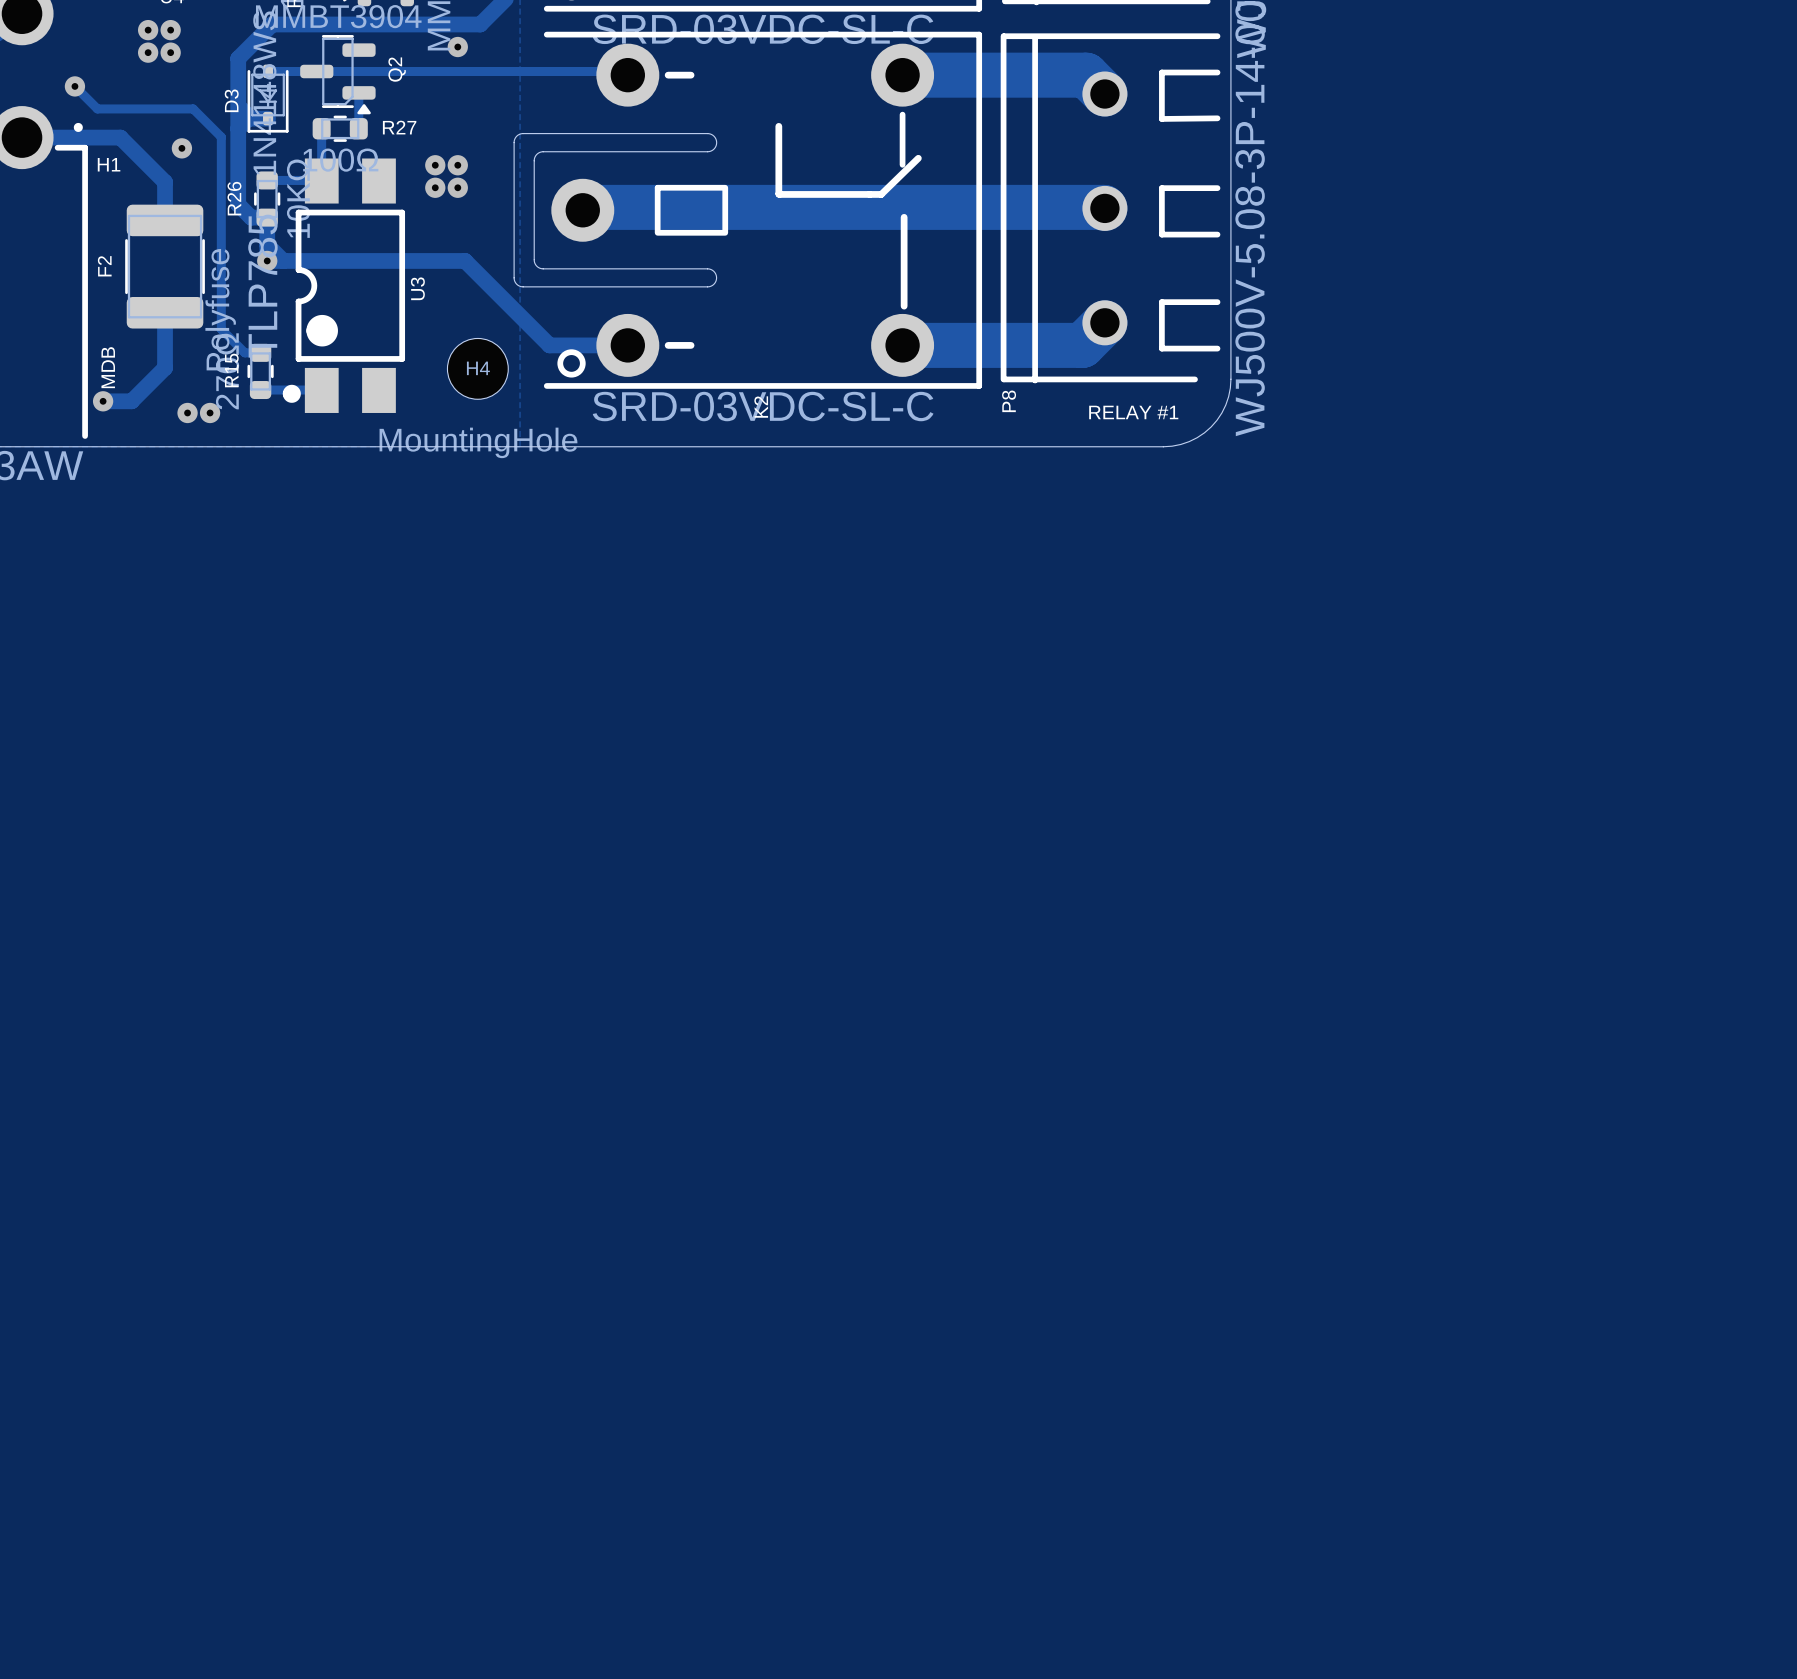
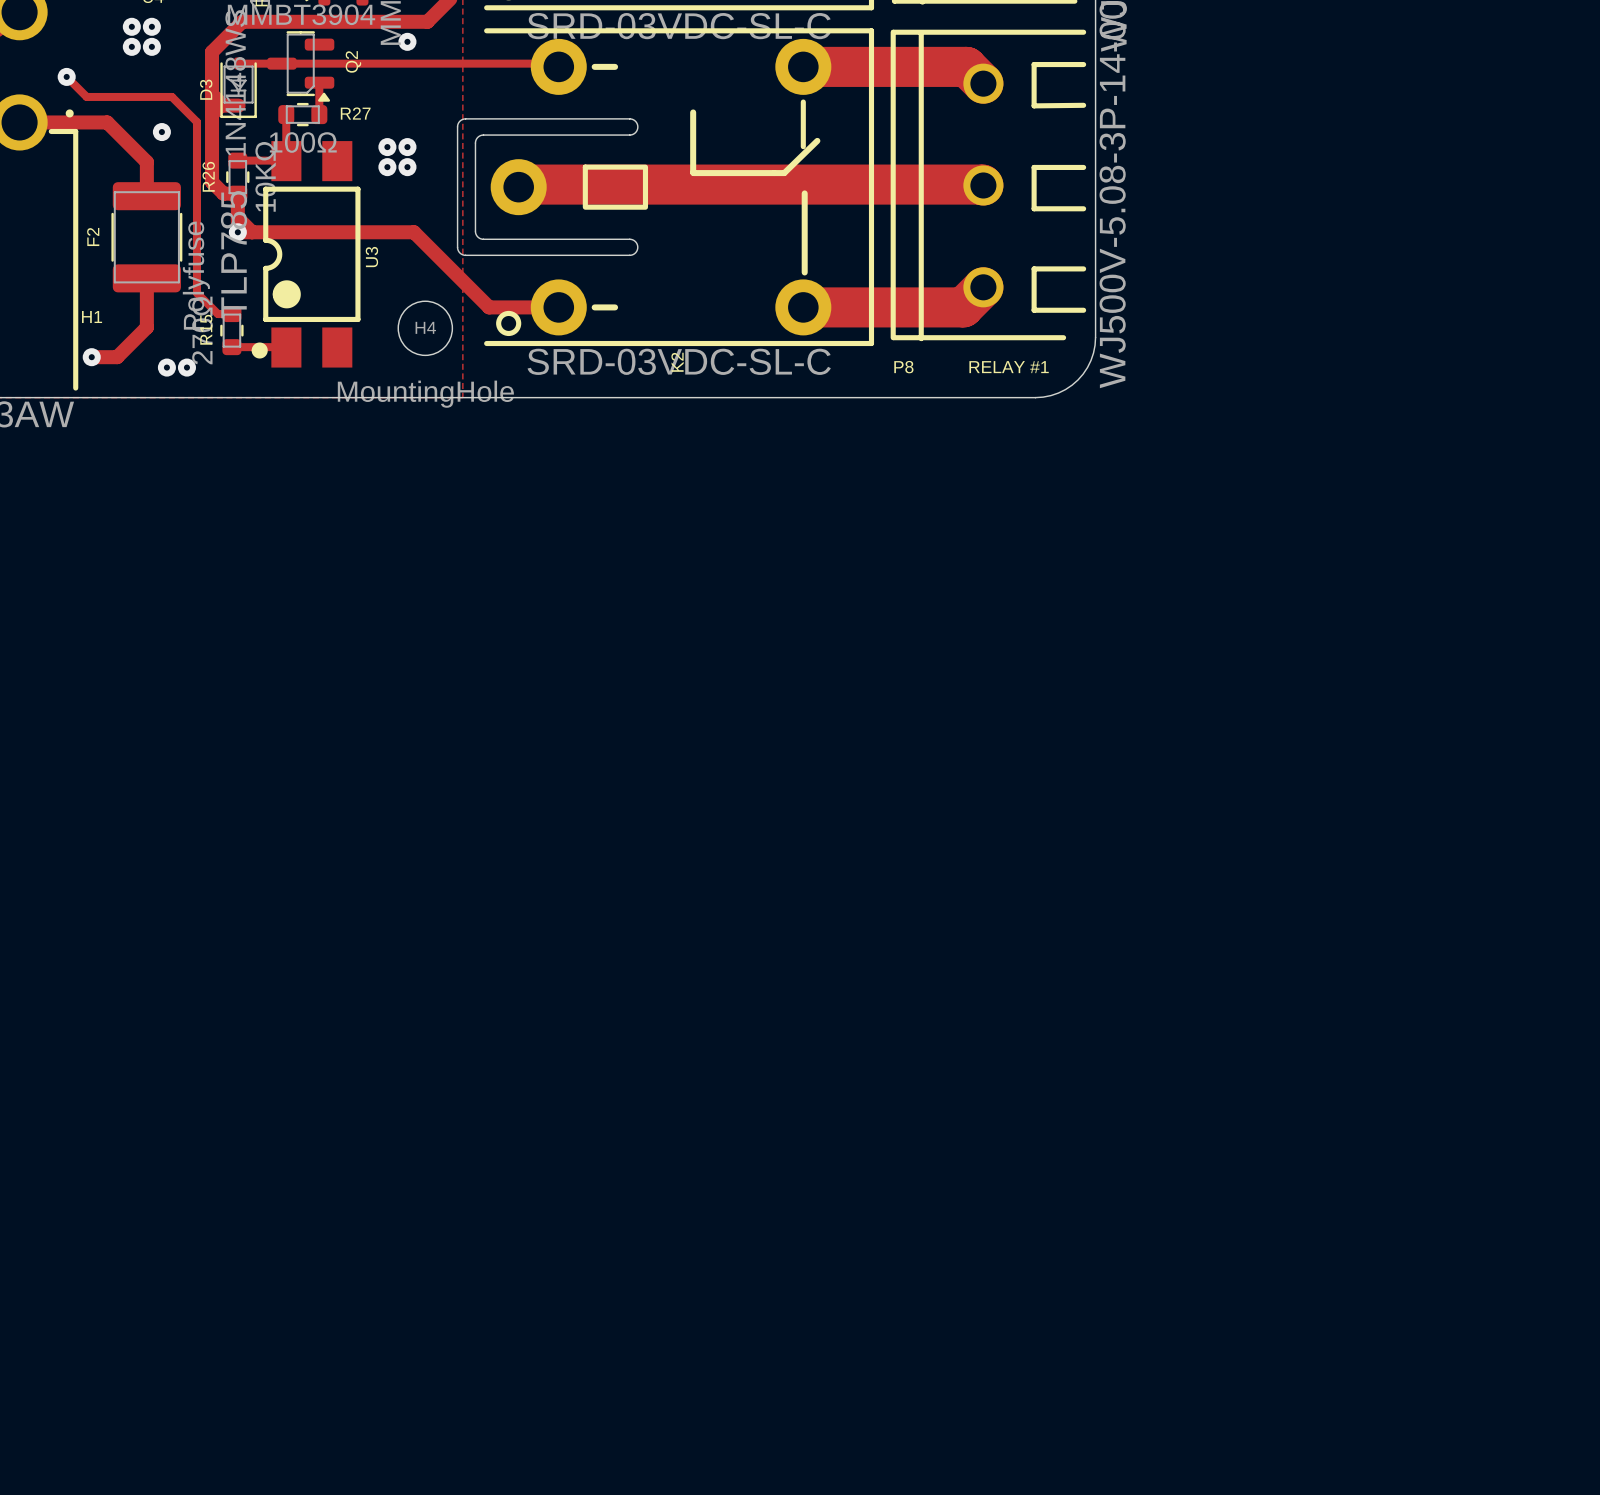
H1 name position: H1 (109, 164) -> H1 (92, 317)
H1 text: MDB (108, 367) -> none
P8 name rotation: 0° (1009, 401) -> 90° clockwise (903, 367)

